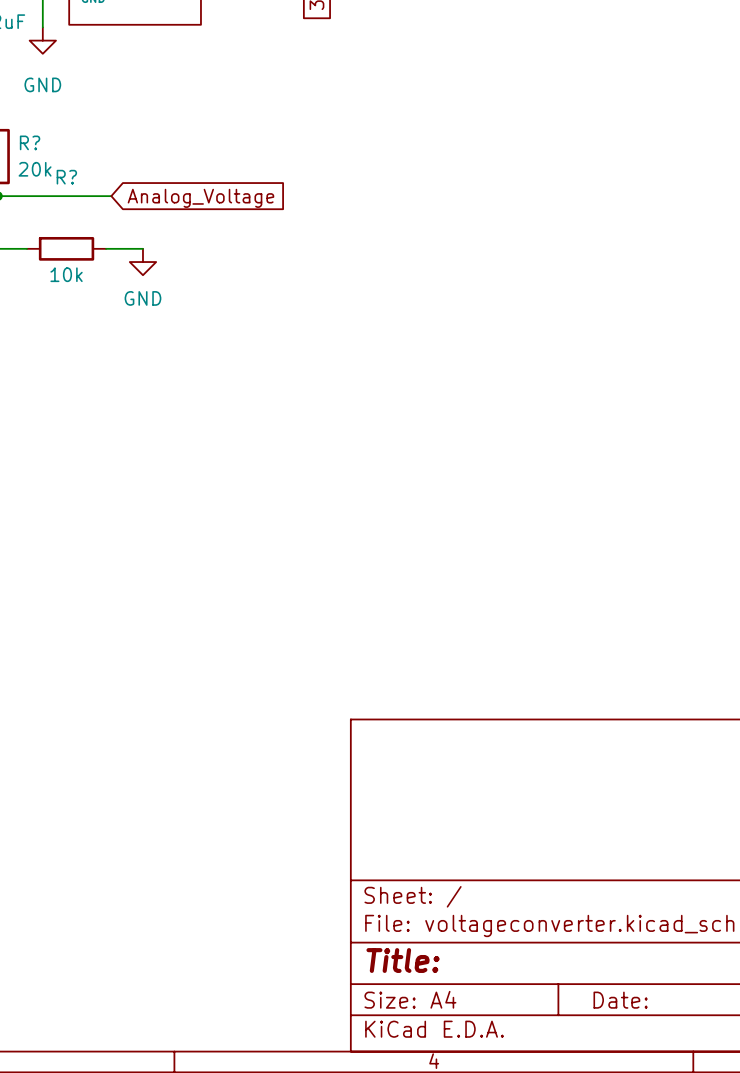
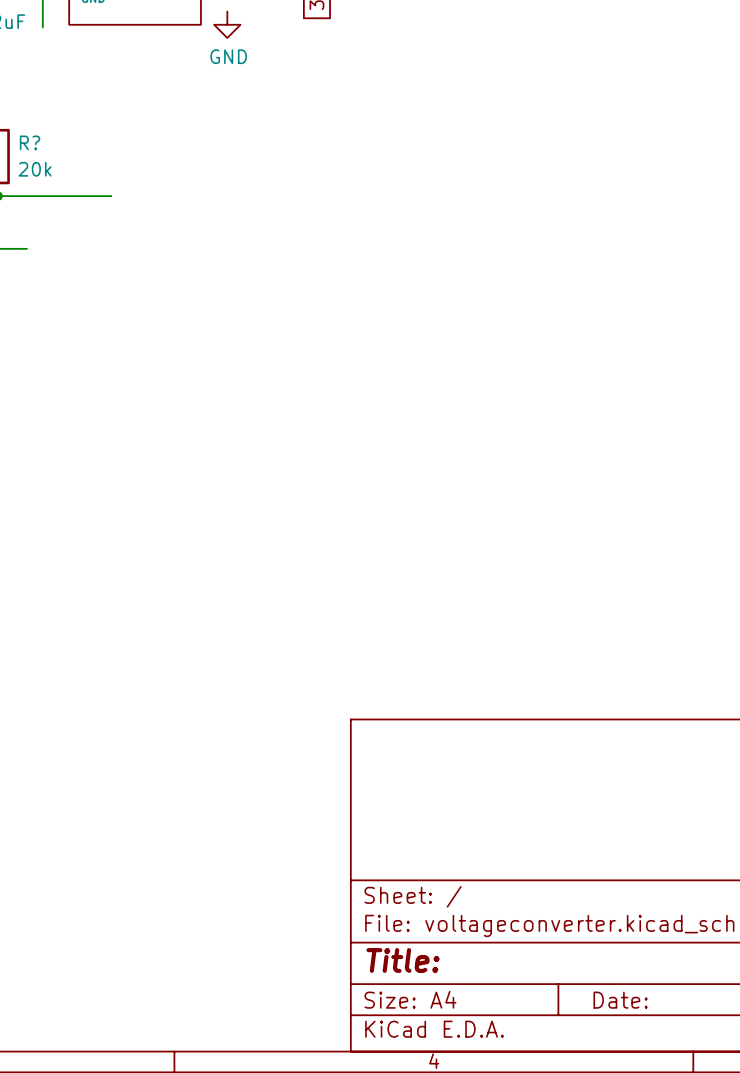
power symbol: none -> GND (227, 24)
power symbol: GND (42, 40) -> none
global label: Analog_Voltage (200, 198) -> none
R?: 10k (66, 248) -> none
wire: (106, 248) (142, 248) -> none
power symbol: GND (142, 262) -> none

